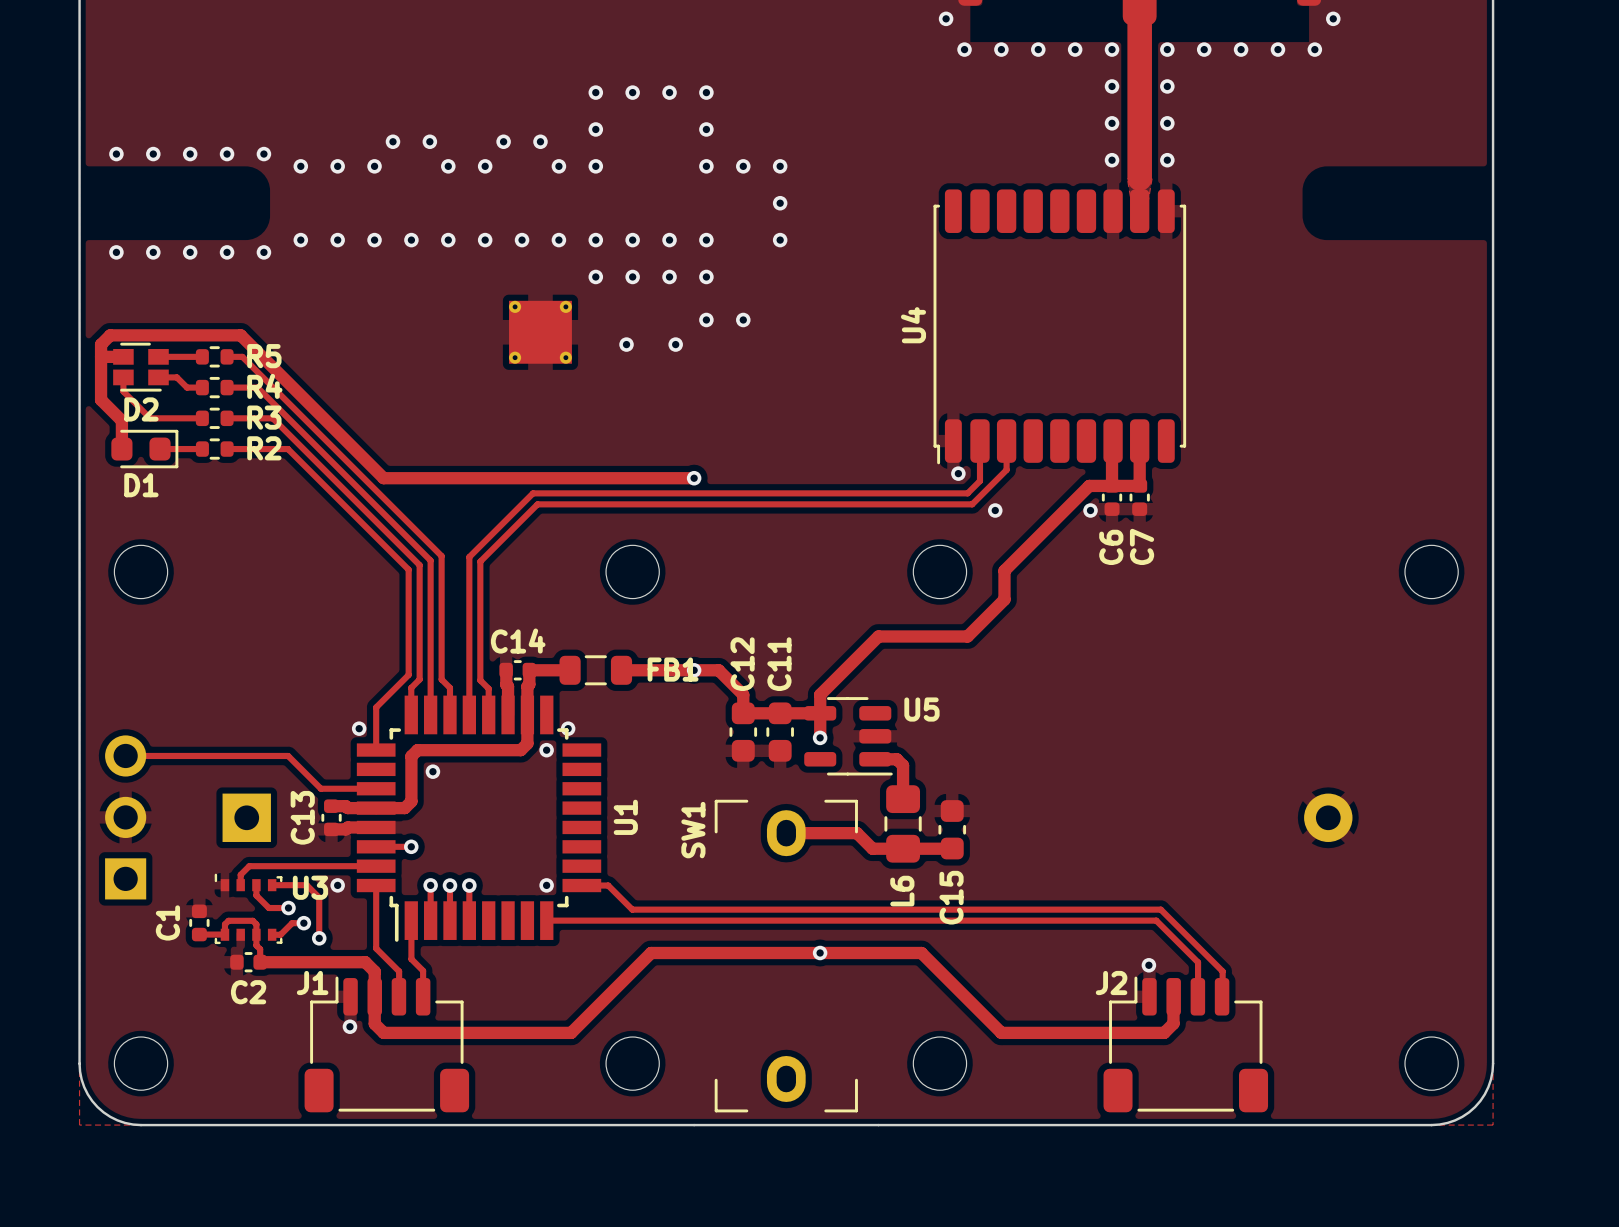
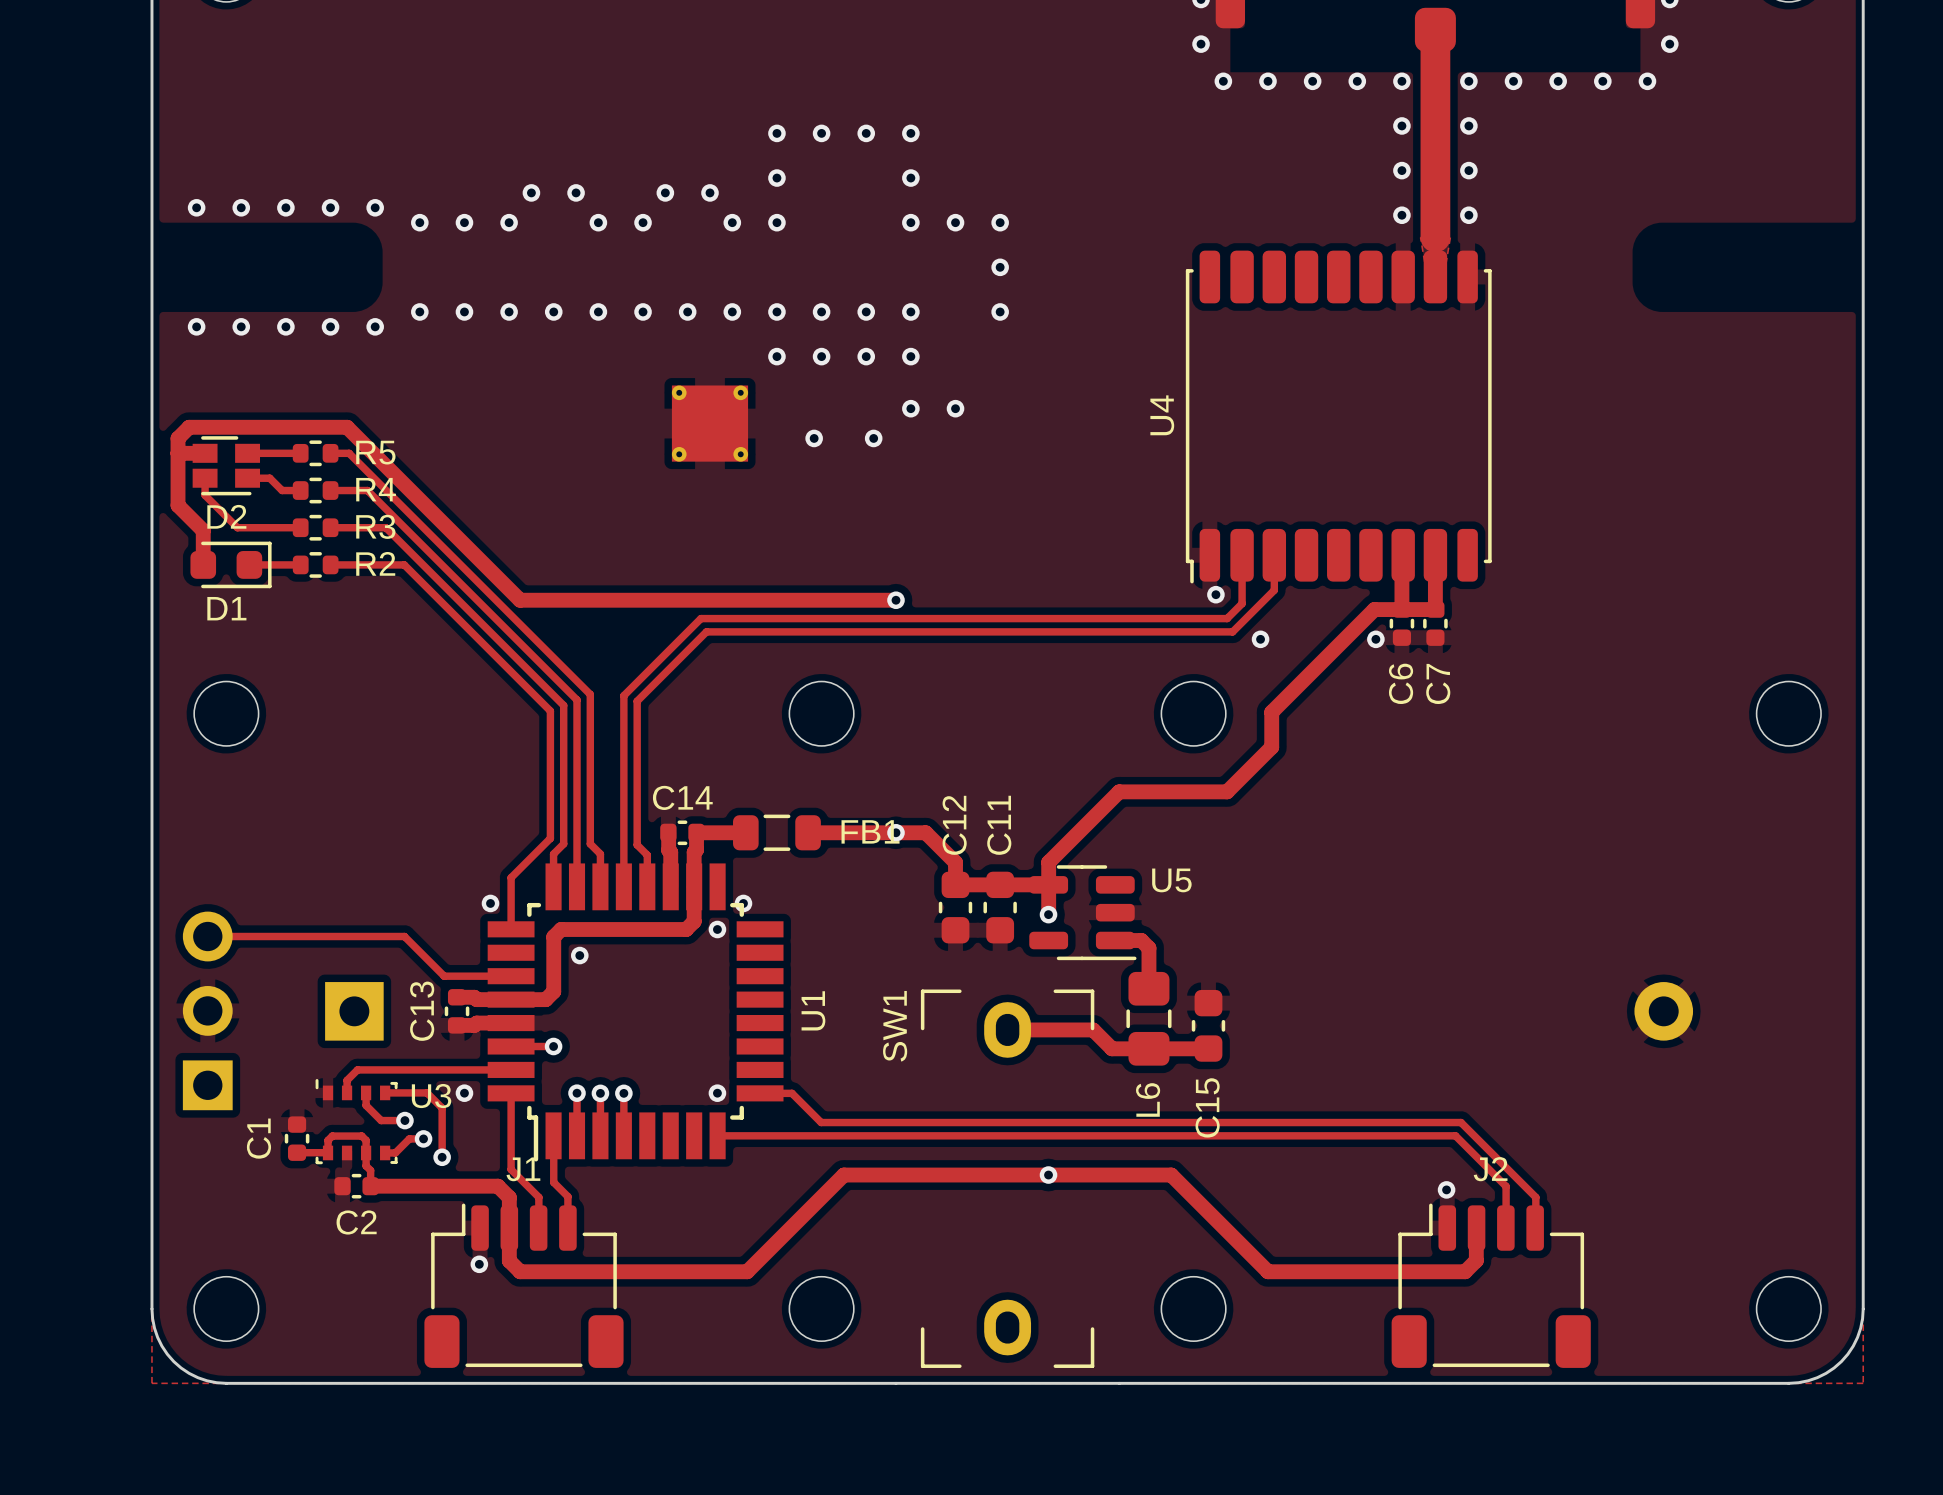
J1 name position: J1 (312, 983) -> J1 (523, 1169)
J2 name position: J2 (1111, 983) -> J2 (1490, 1169)

